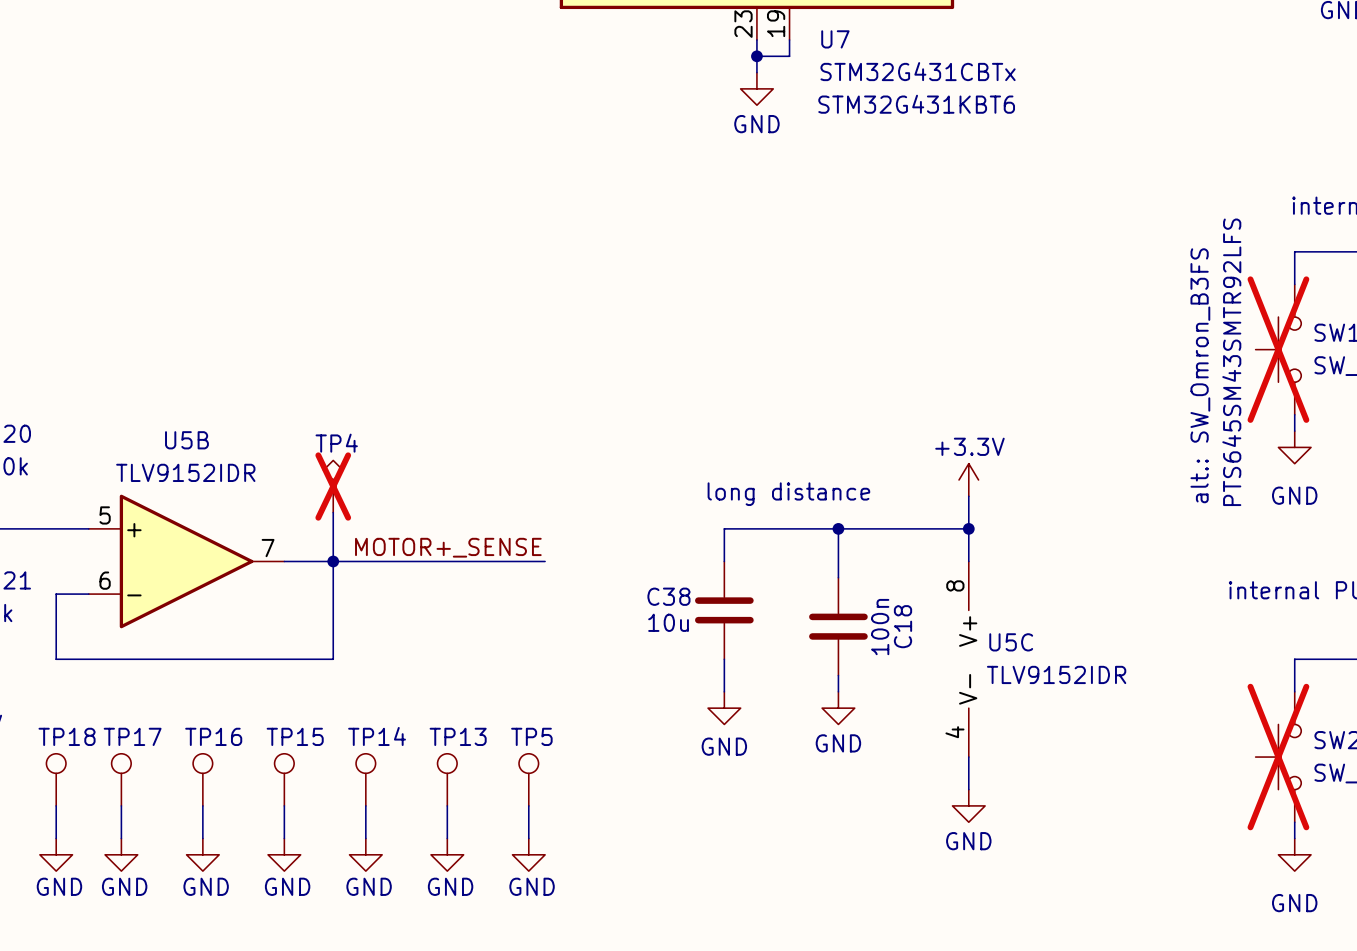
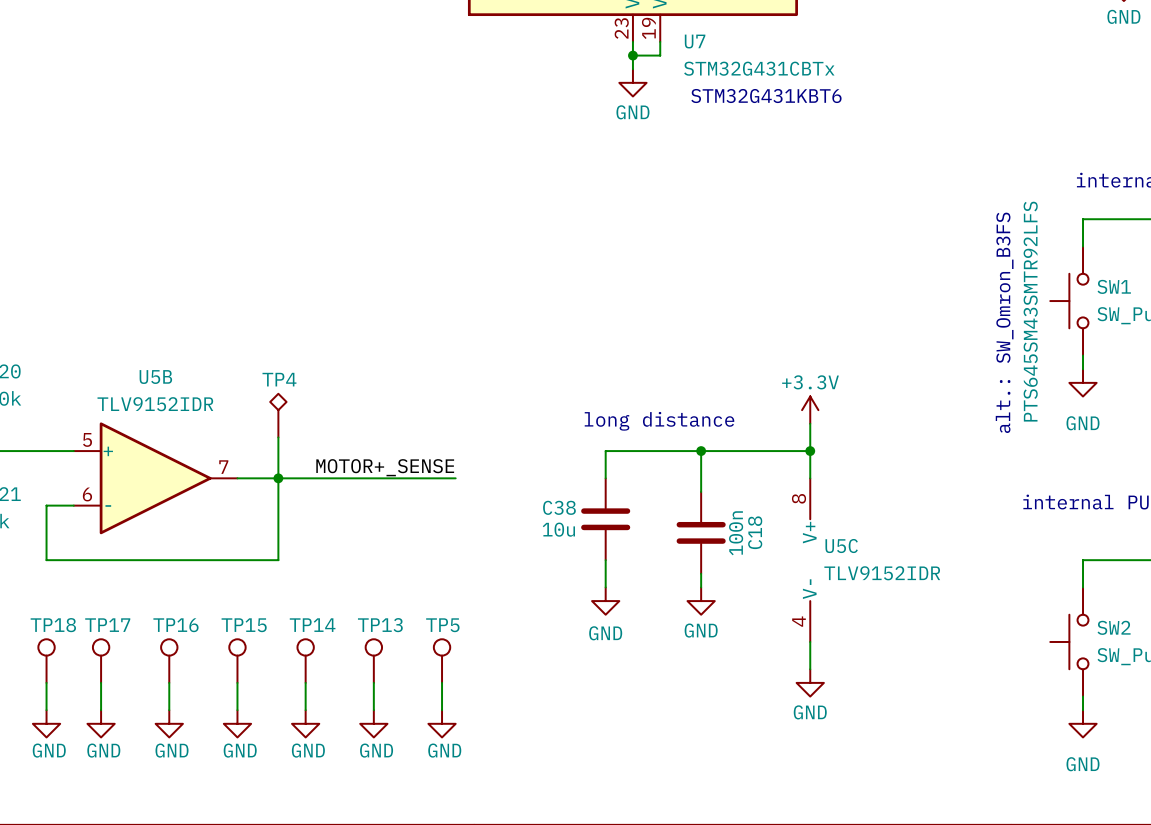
SW1 do-not-place cross: (1278, 349) -> none
TP4 do-not-place cross: (333, 486) -> none
SW2 do-not-place cross: (1278, 757) -> none

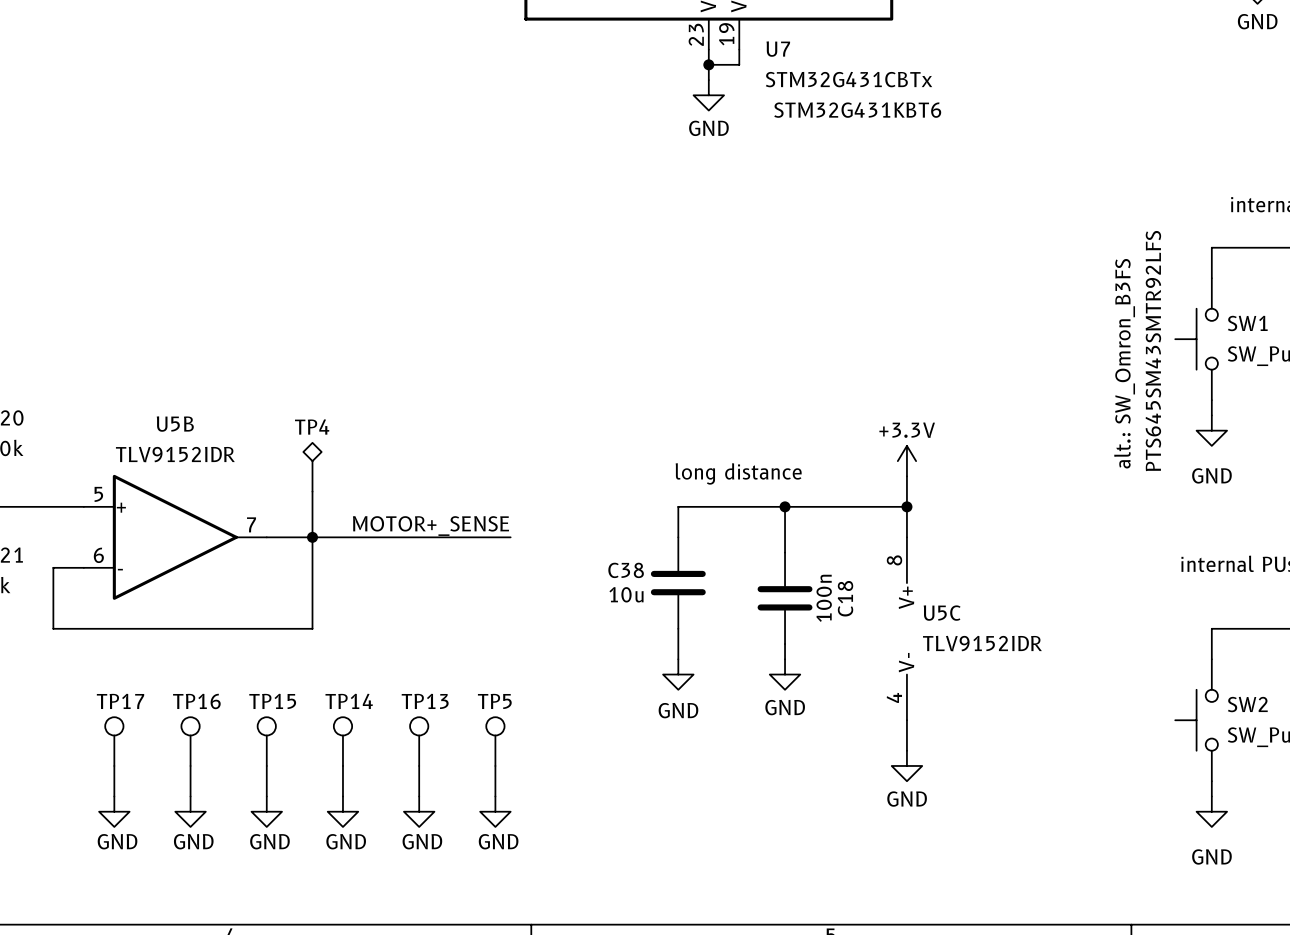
TP18: (46, 661) -> none
wire: (46, 682) (46, 710) -> none
power symbol: GND (46, 723) -> none

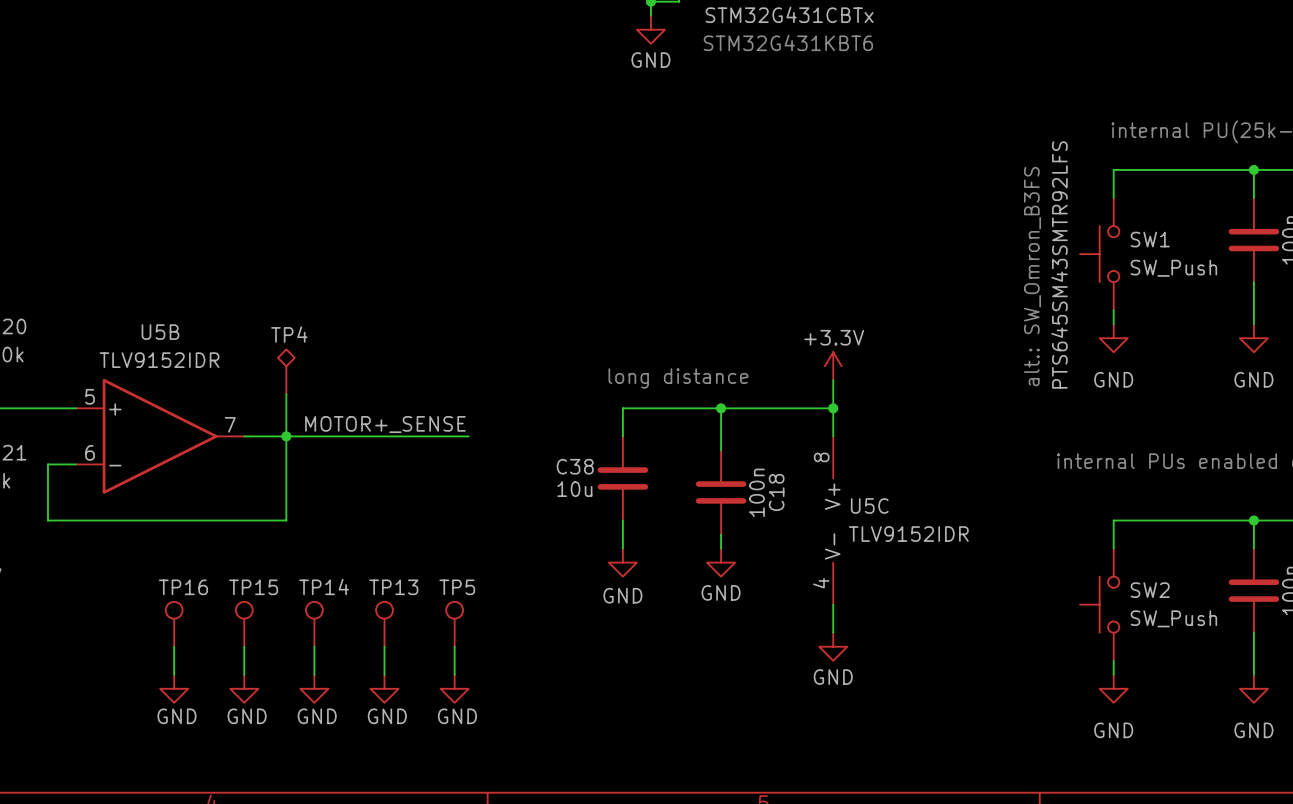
TP17: (114, 741) -> none
wire: (114, 765) (114, 796) -> none
power symbol: GND (114, 811) -> none

